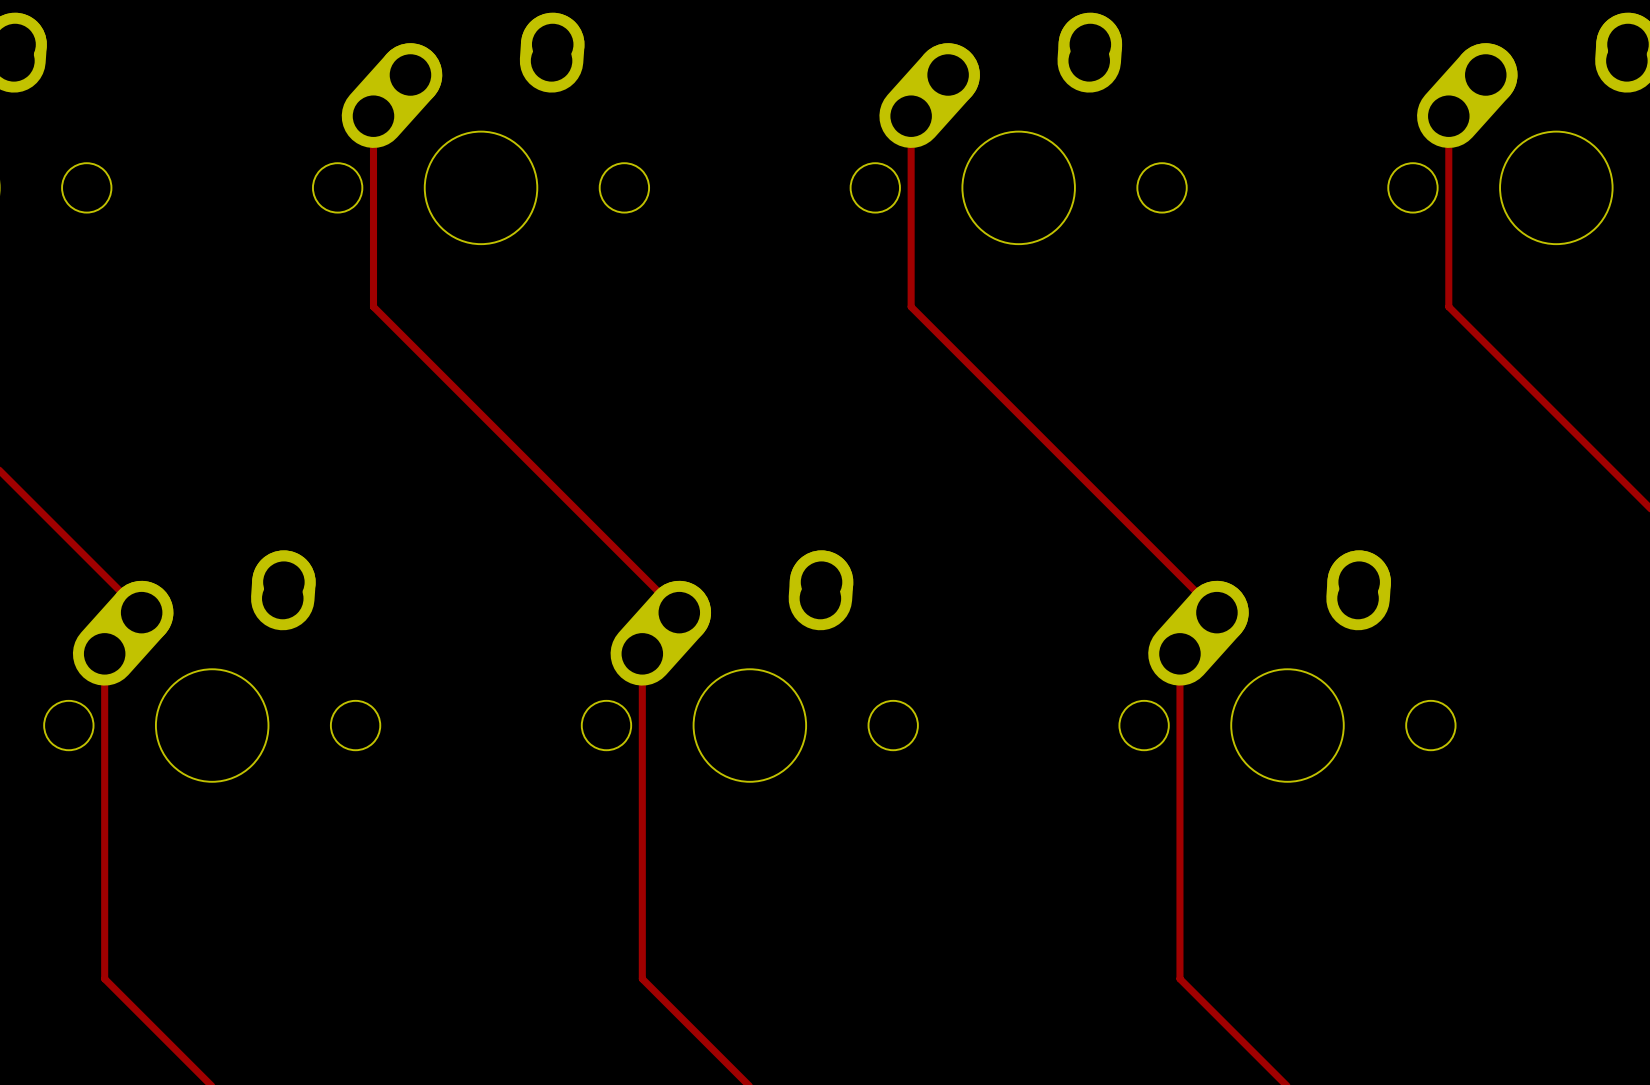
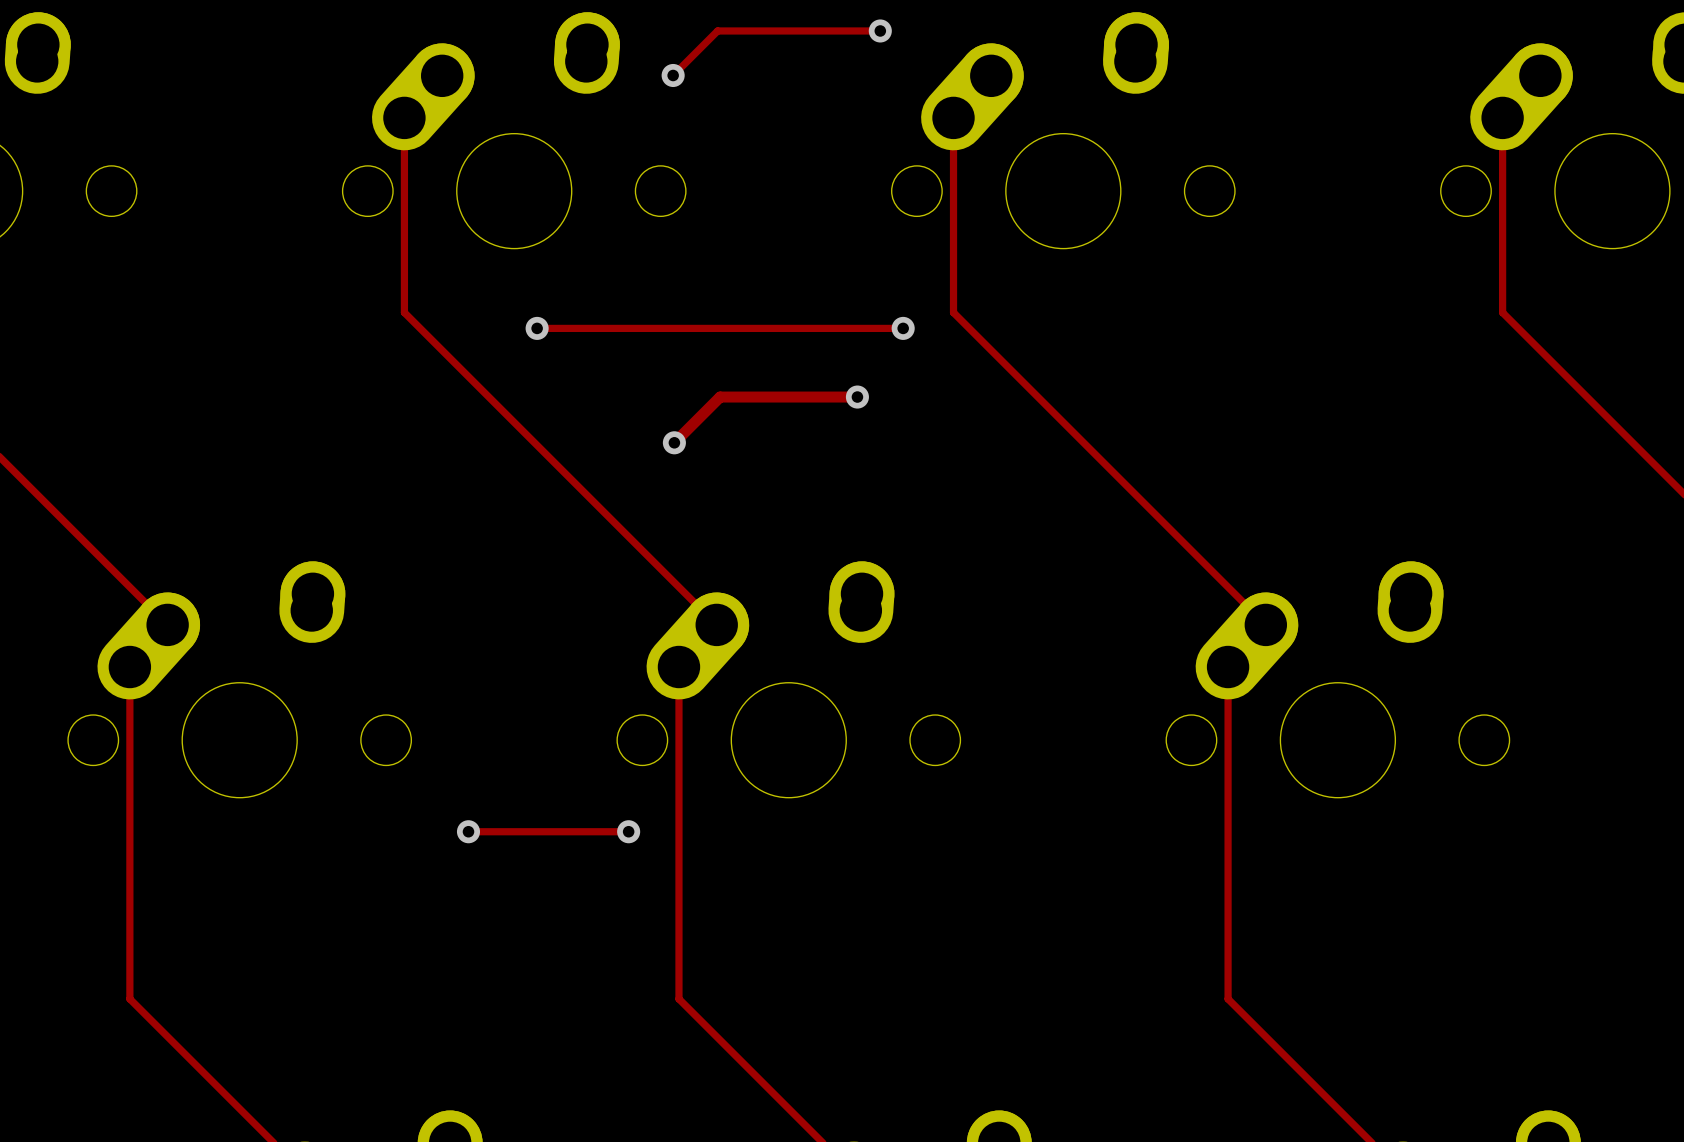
track: none -> (880, 30) (717, 30) (673, 75)
via: none -> (880, 30)
via: none -> (673, 75)
track: none -> (537, 328) (903, 328)
via: none -> (537, 328)
via: none -> (903, 328)
track: none -> (857, 397) (720, 397) (674, 442)
via: none -> (857, 397)
via: none -> (674, 442)
track: none -> (468, 831) (628, 831)
via: none -> (468, 831)
via: none -> (628, 831)

